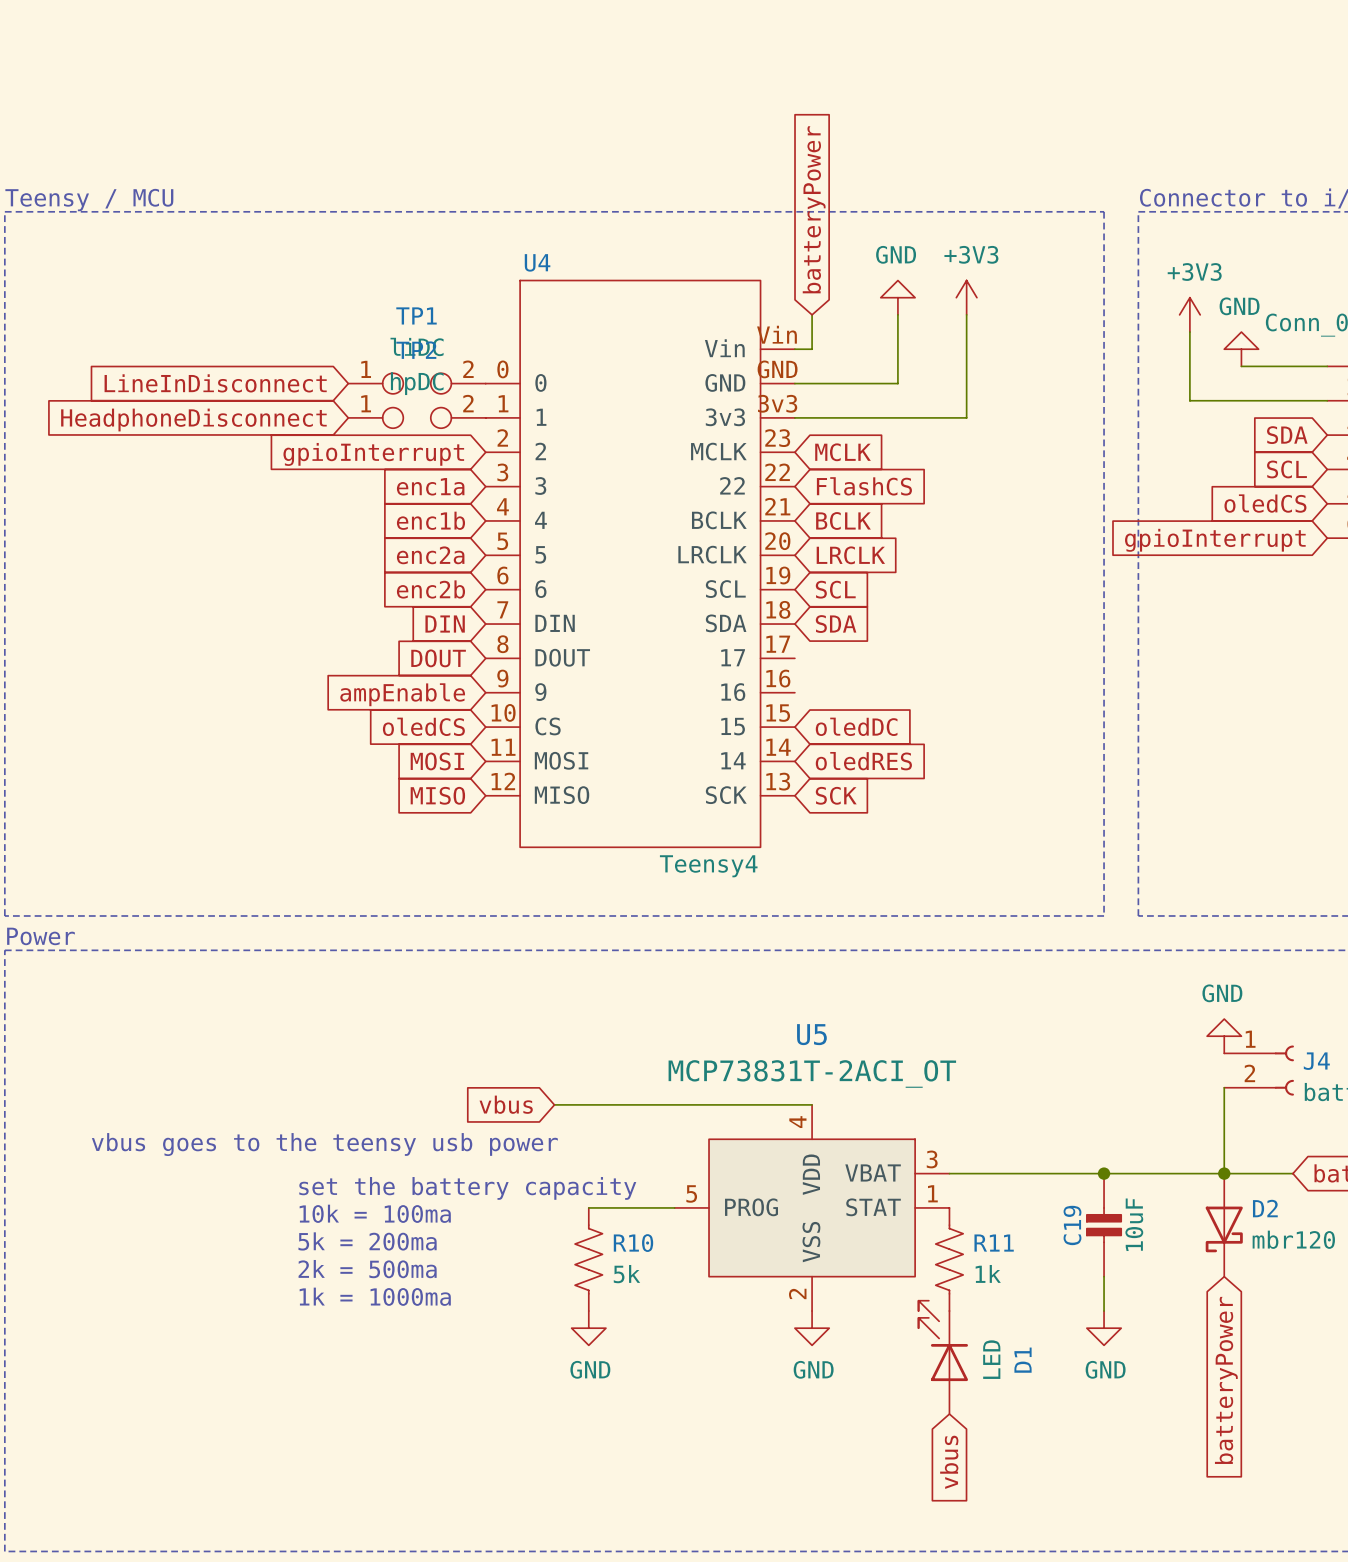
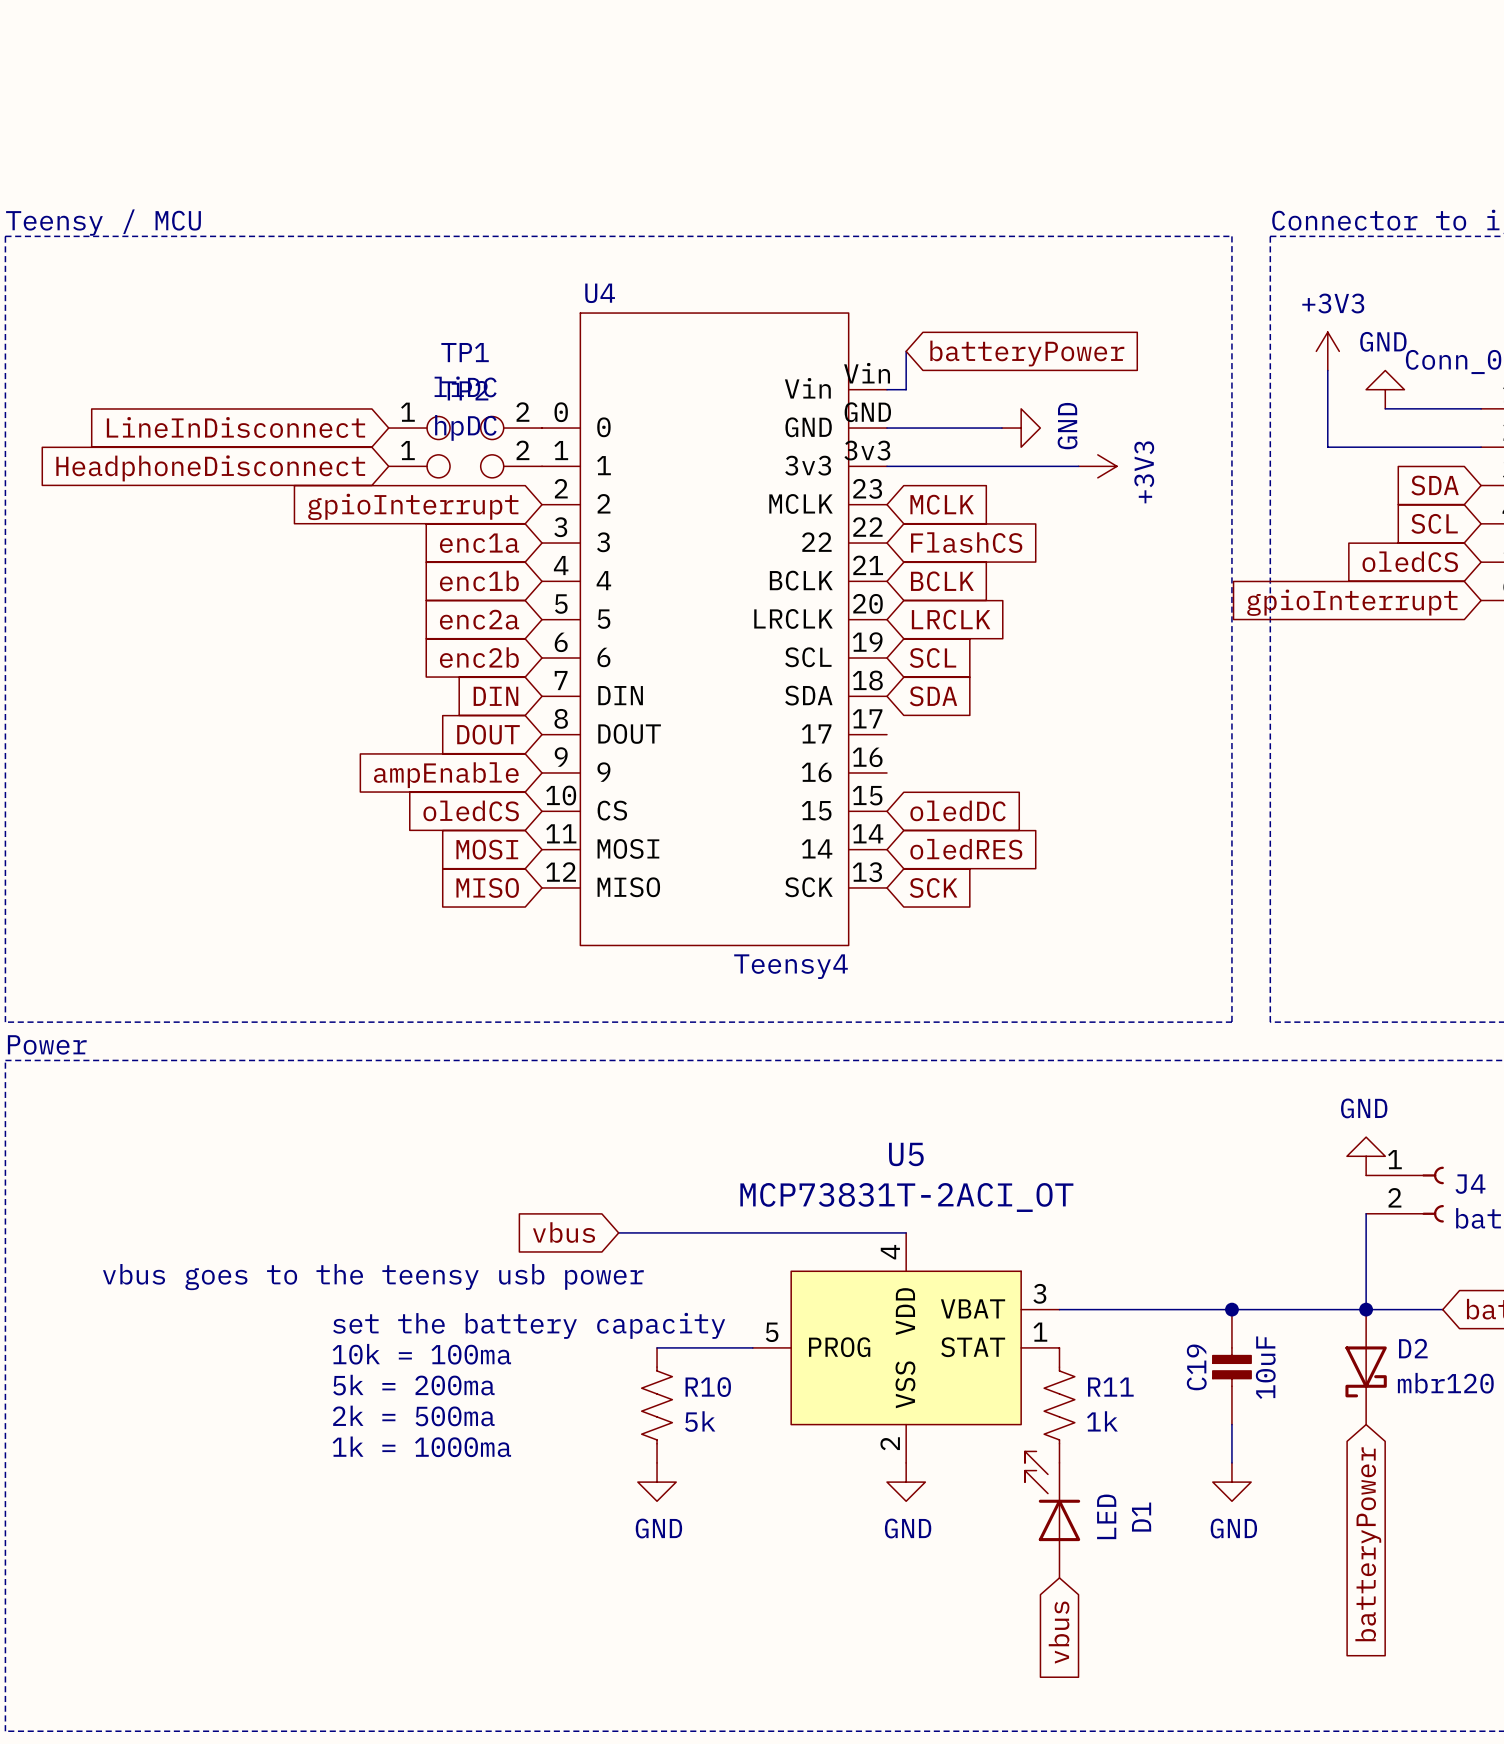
global label rotation: 0° (814, 209) -> 90° clockwise (1027, 353)
power symbol rotation: 0° (897, 297) -> 90° clockwise (1021, 428)
power symbol position: GND (897, 297) -> GND (1021, 428)
power symbol rotation: 0° (966, 297) -> 90° clockwise (1097, 466)
power symbol position: +3V3 (966, 297) -> +3V3 (1097, 466)
wire: (897, 314) (897, 383) -> none
wire: (966, 314) (966, 417) -> none

